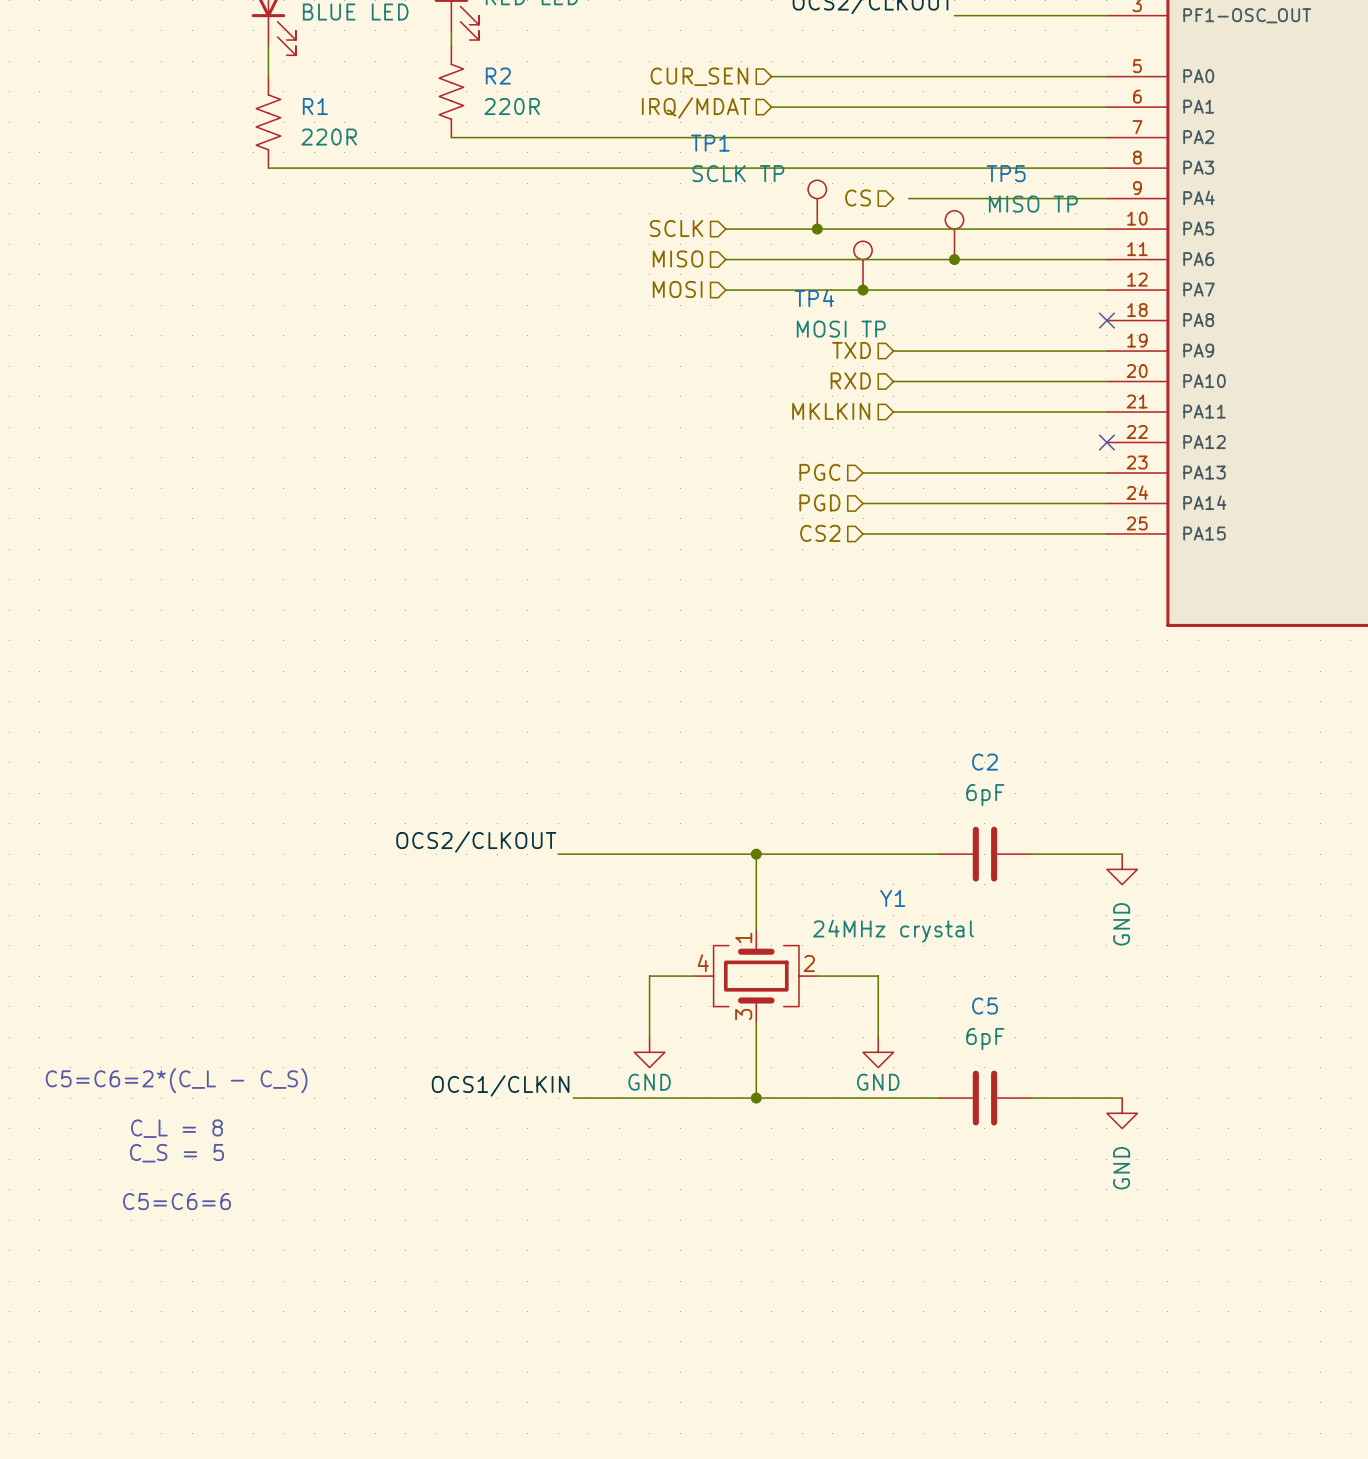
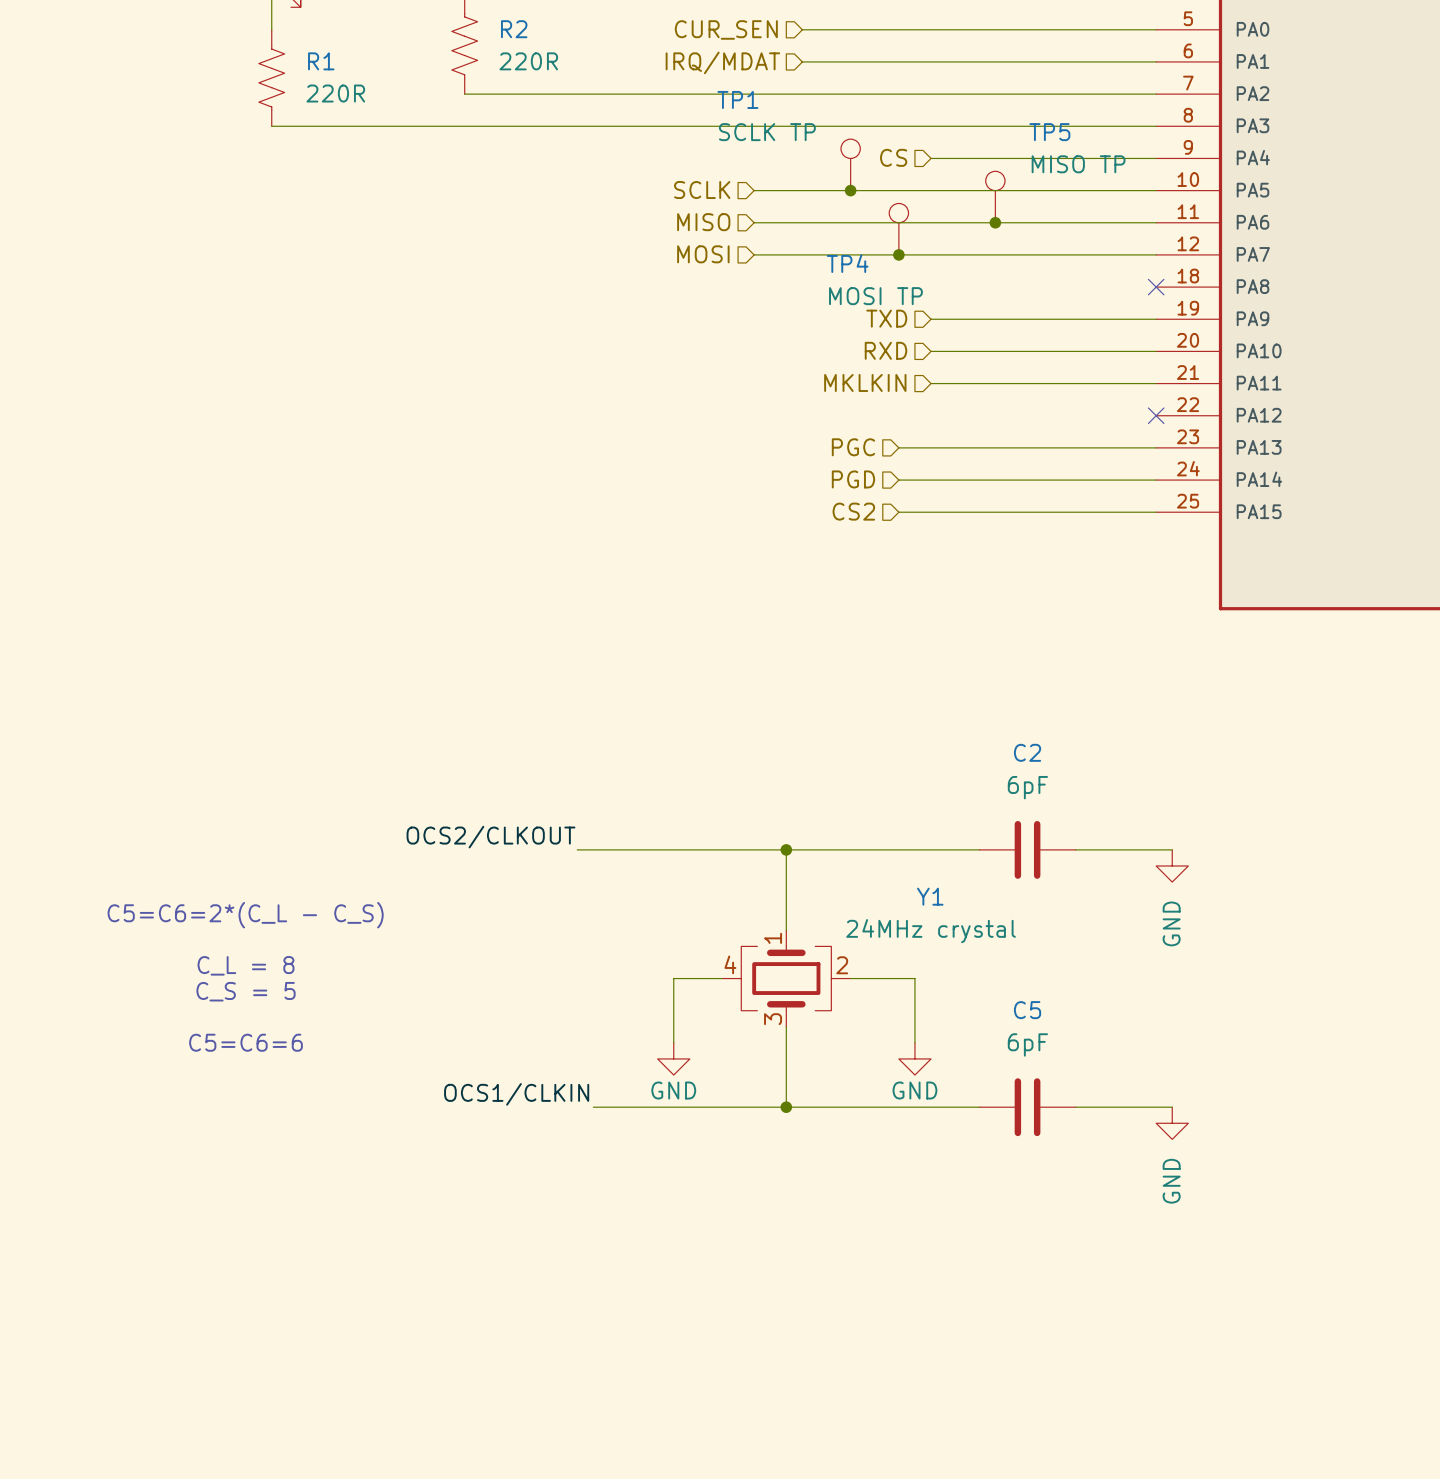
wire: none -> (931, 158) (947, 158)
text position: C5=C6=2*(C_L - C_S) (176, 1080) -> C5=C6=2*(C_L - C_S) (245, 915)
text position: C_L = 8 (176, 1128) -> C_L = 8 (246, 965)
text position: C_S = 5 (176, 1153) -> C_S = 5 (246, 991)
text position: C5=C6=6 (176, 1201) -> C5=C6=6 (246, 1042)

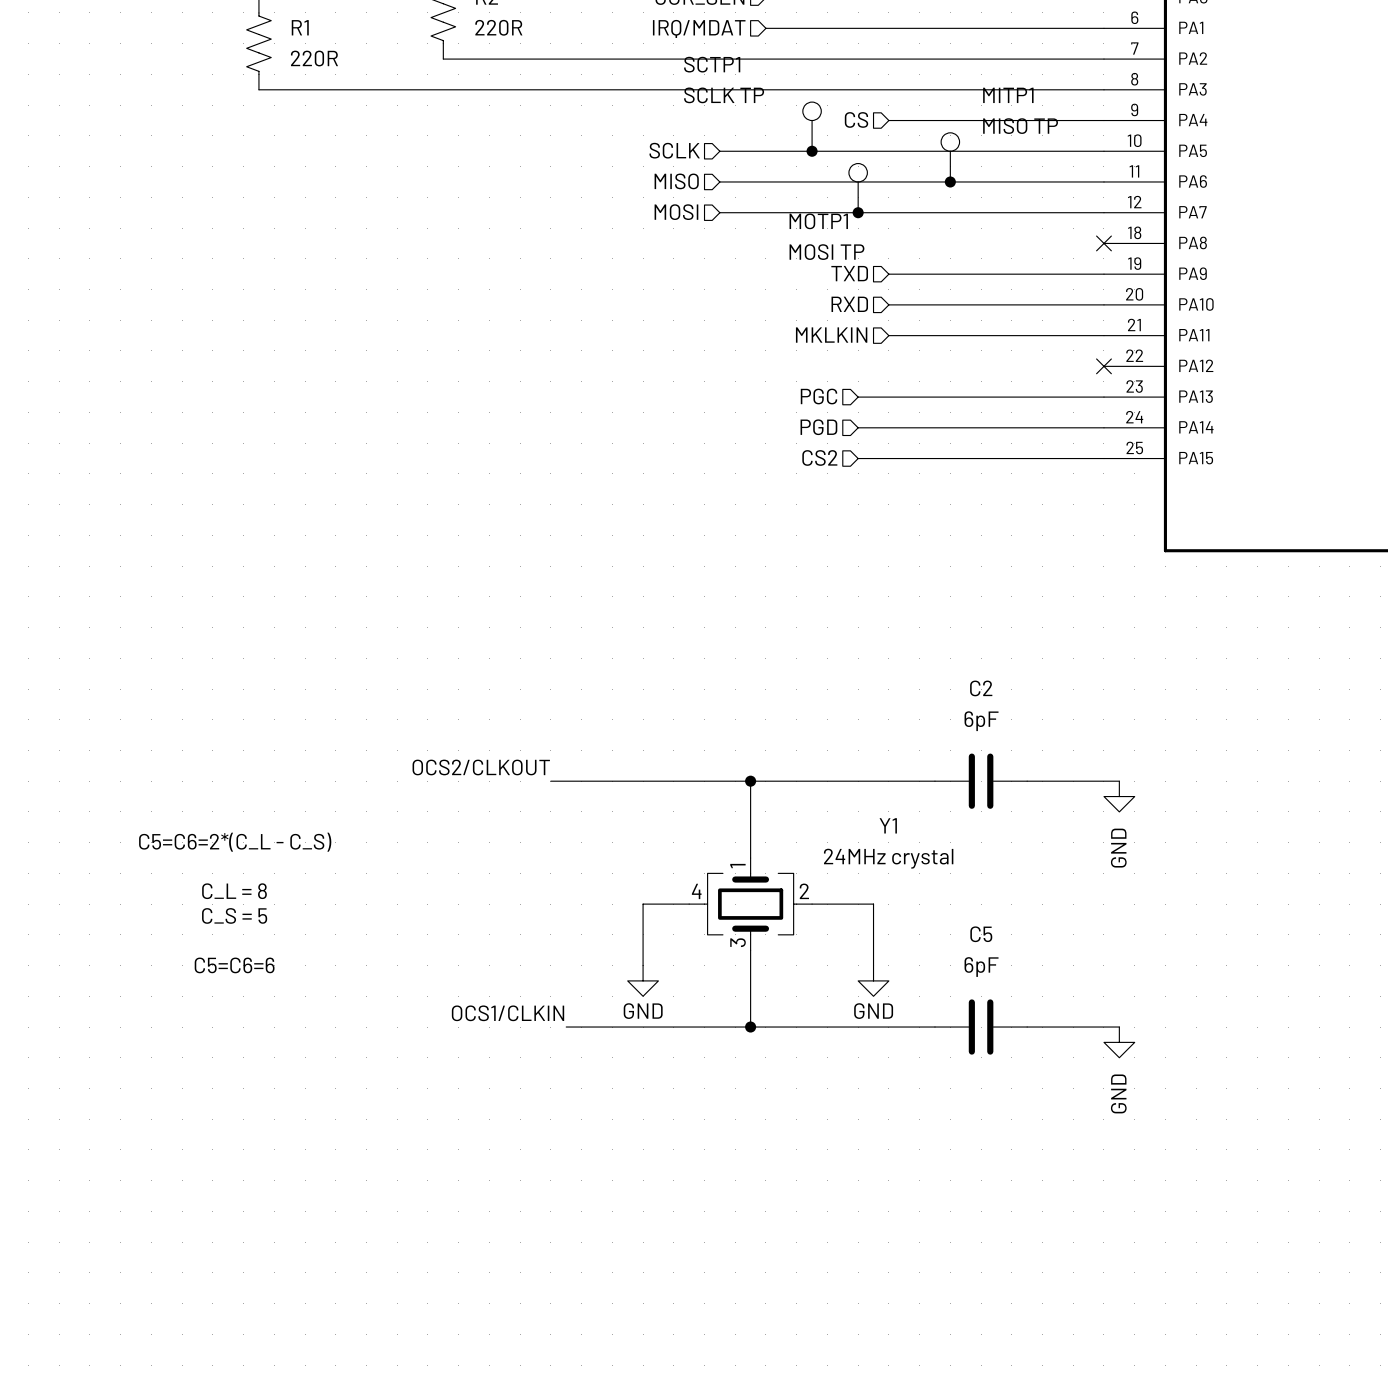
TP1 name: TP1 (737, 99) -> SCTP1 (712, 64)
TP5 name: TP5 (1049, 132) -> MITP1 (1008, 95)
TP4 name: TP4 (847, 263) -> MOTP1 (818, 221)

